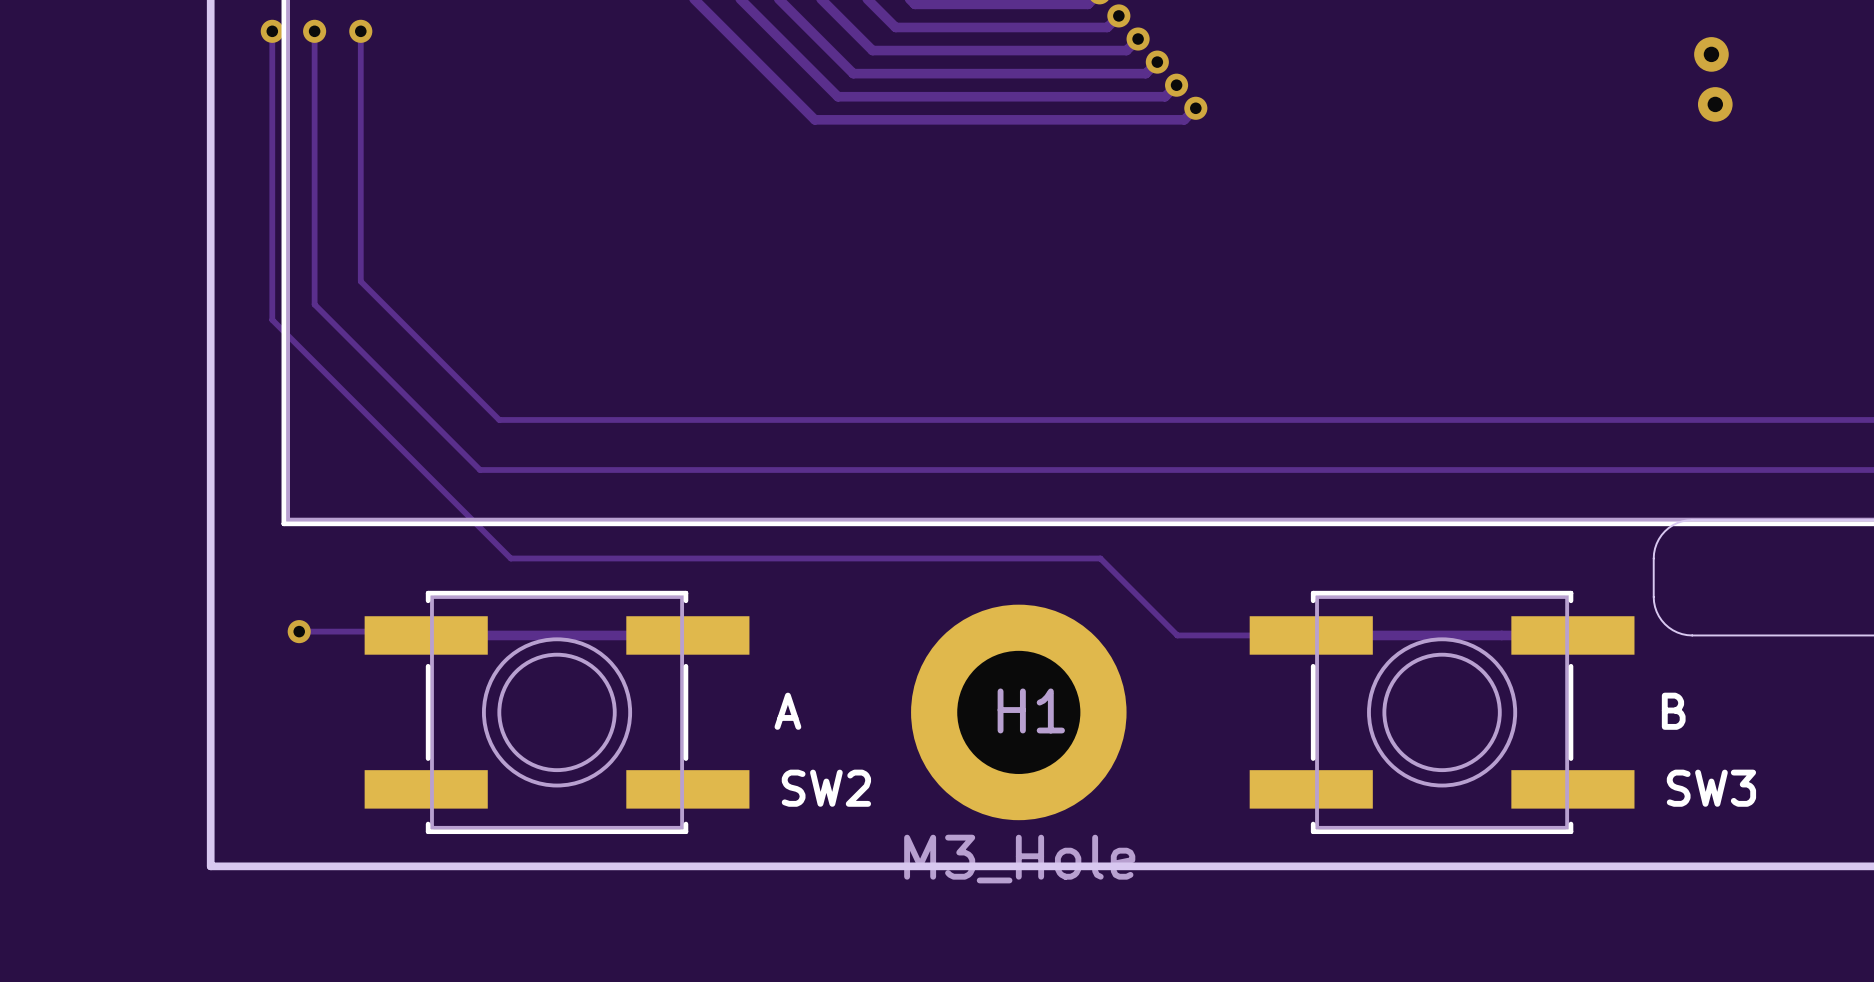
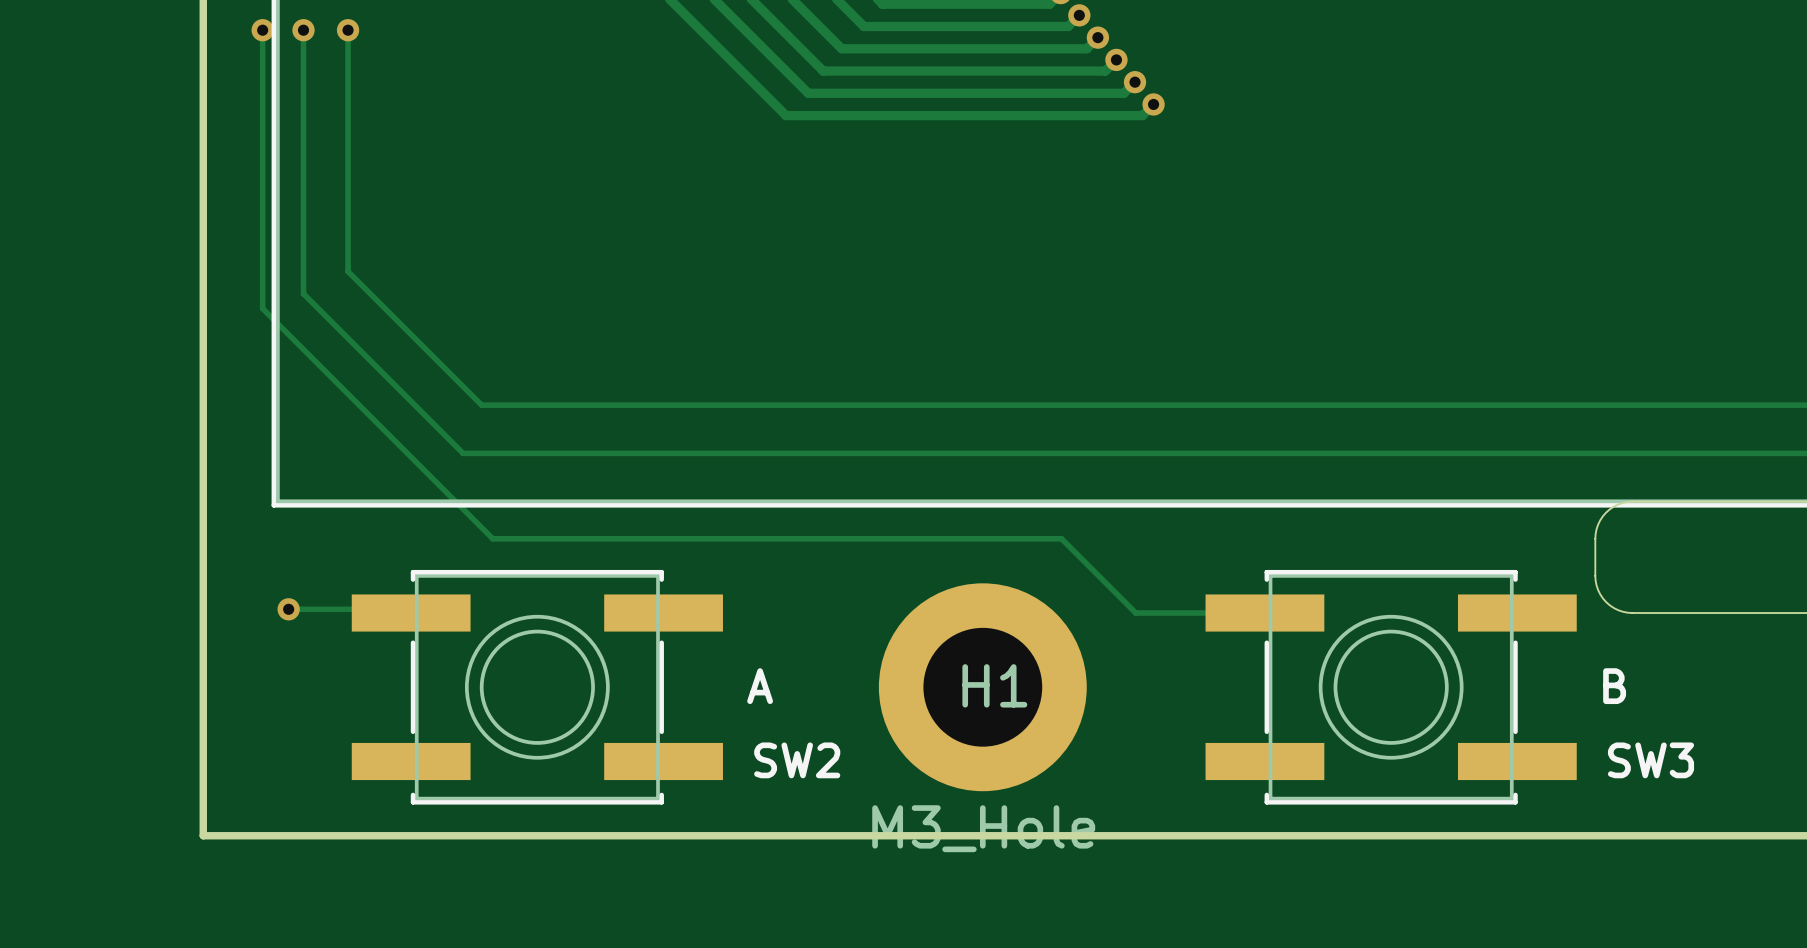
via: (1711, 54) -> none
via: (1715, 104) -> none
track: (426, 635) (687, 635) -> none
track: (1311, 635) (1572, 635) -> none

